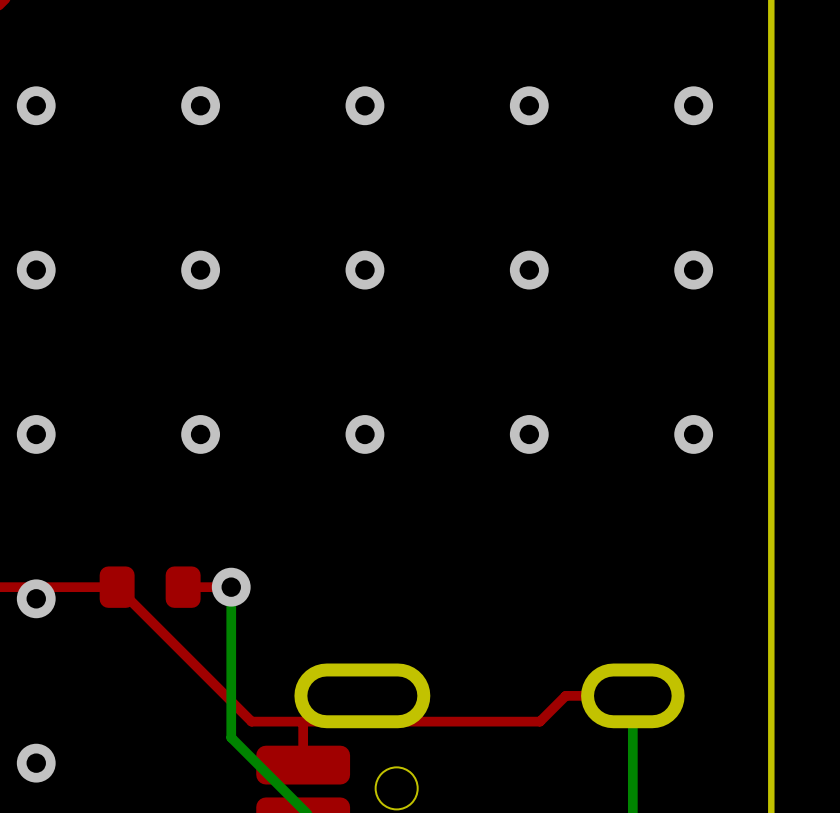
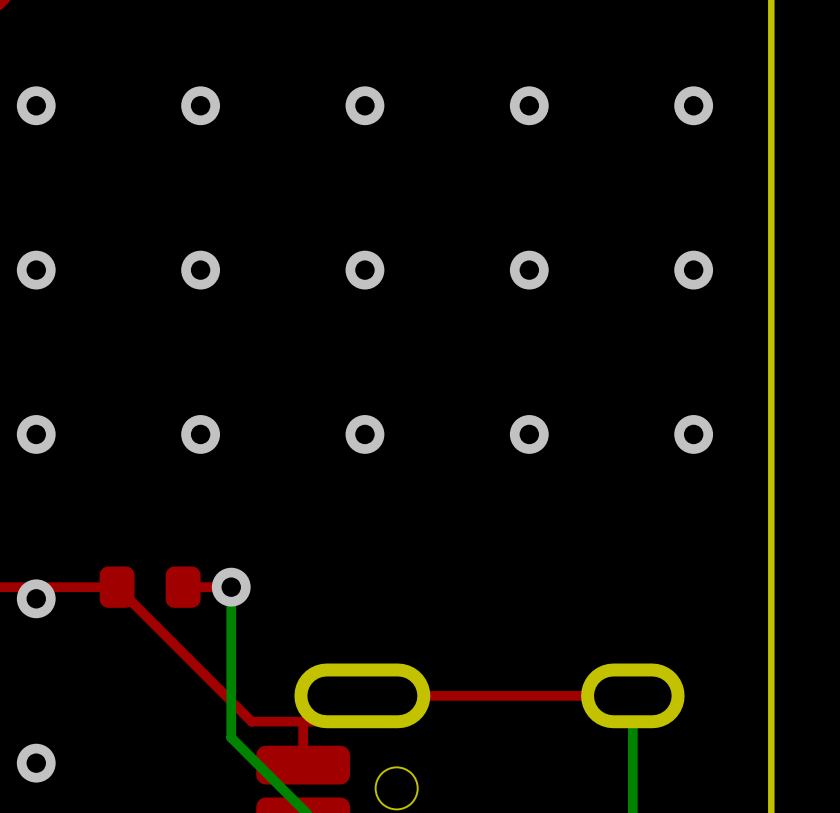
top track: (565, 695) (539, 721) (336, 721) -> (565, 695) (362, 695)

